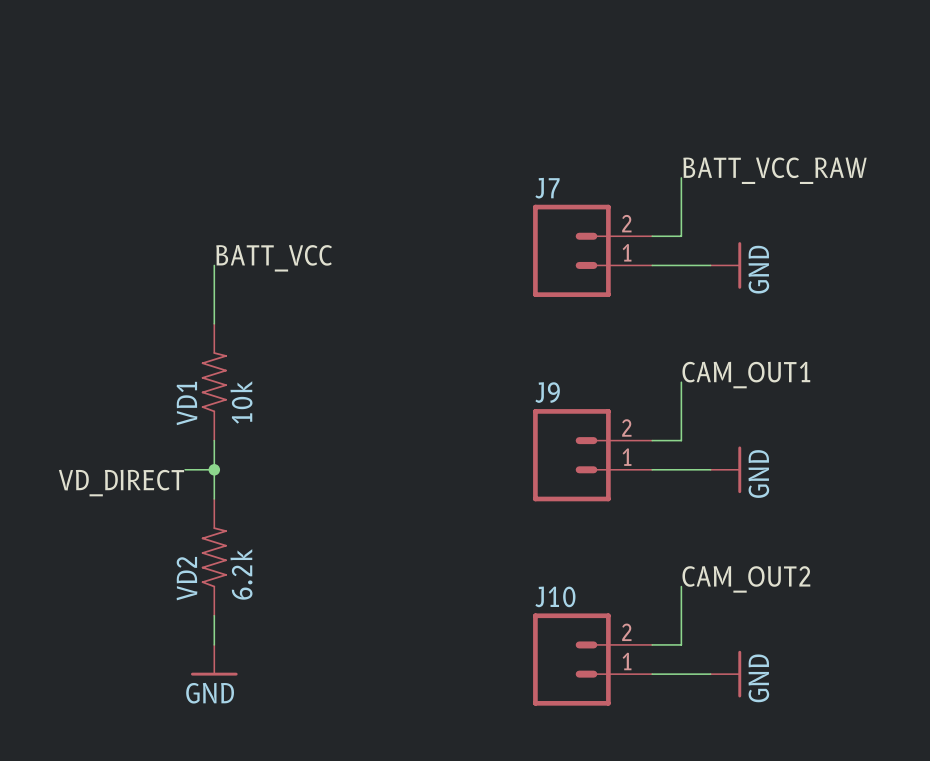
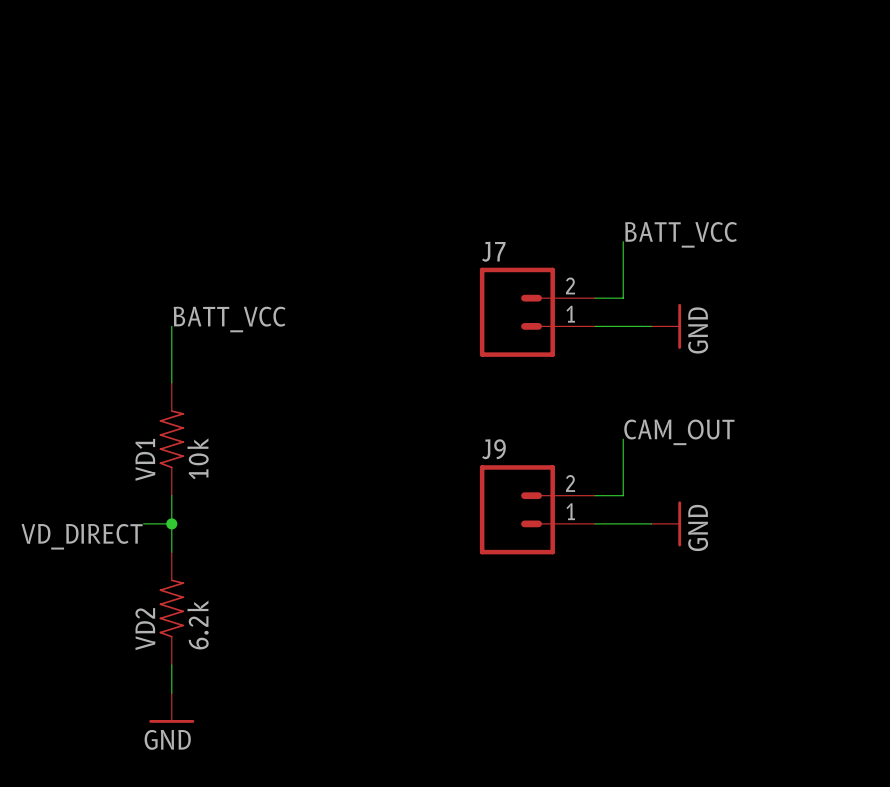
label: BATT_VCC_RAW (774, 170) -> BATT_VCC (681, 234)
label: CAM_OUT1 (746, 375) -> CAM_OUT (679, 432)
label: CAM_OUT2 (746, 579) -> none
wire: (681, 586) (681, 644) (652, 644) -> none
J10: (592, 659) -> none
wire: (652, 674) (710, 674) -> none
power symbol: GND (725, 674) -> none

